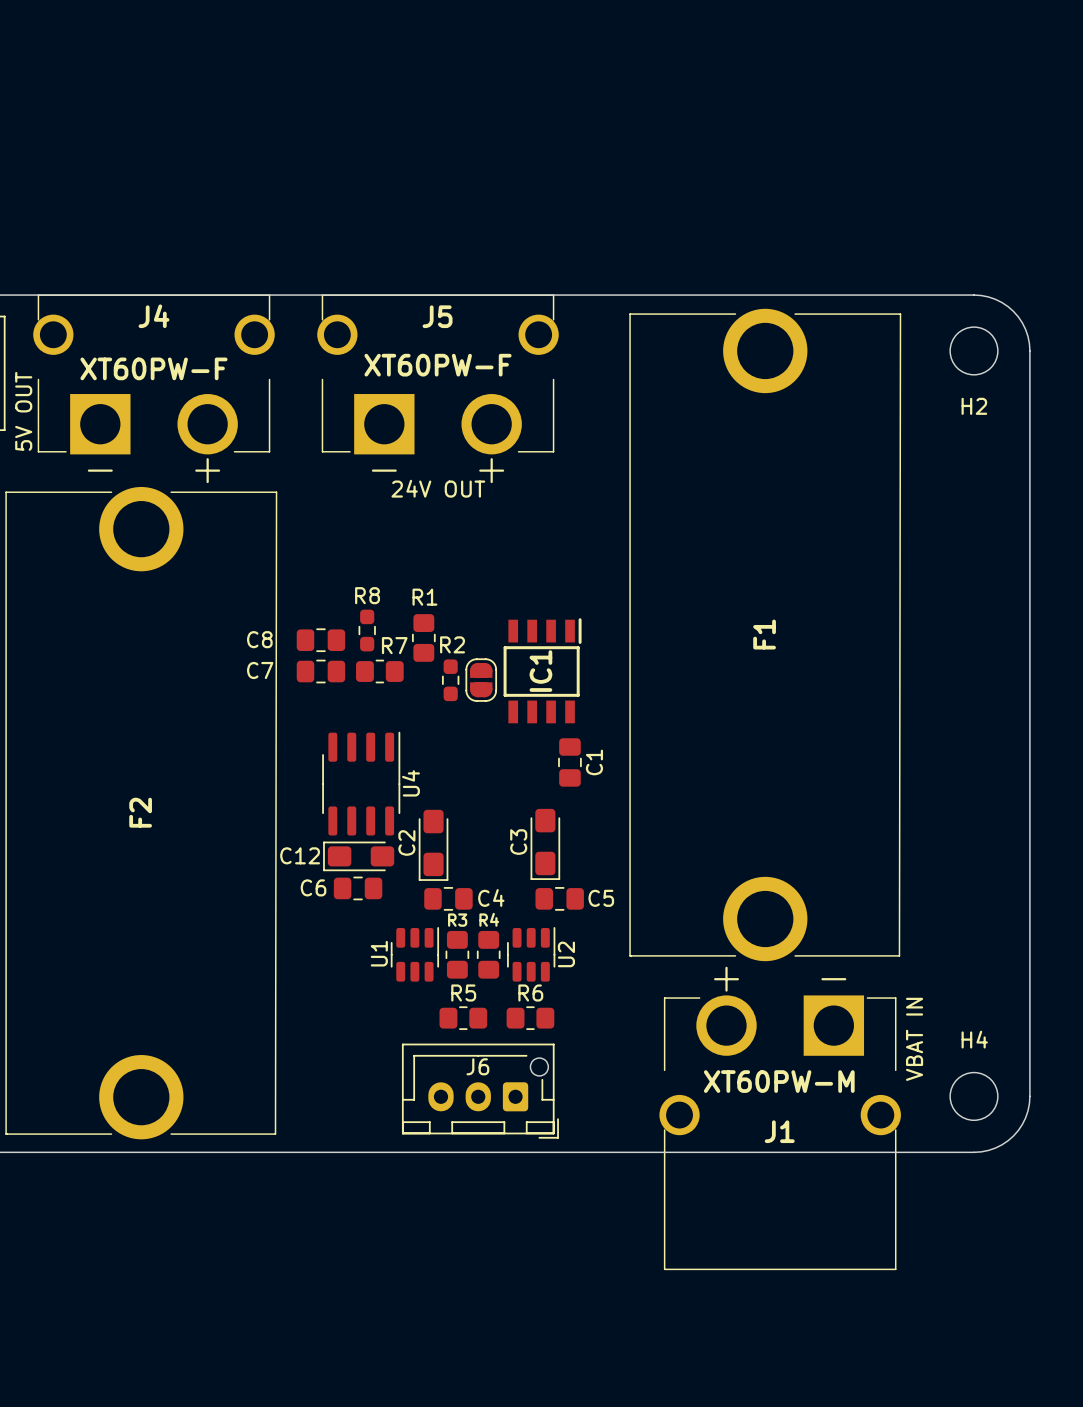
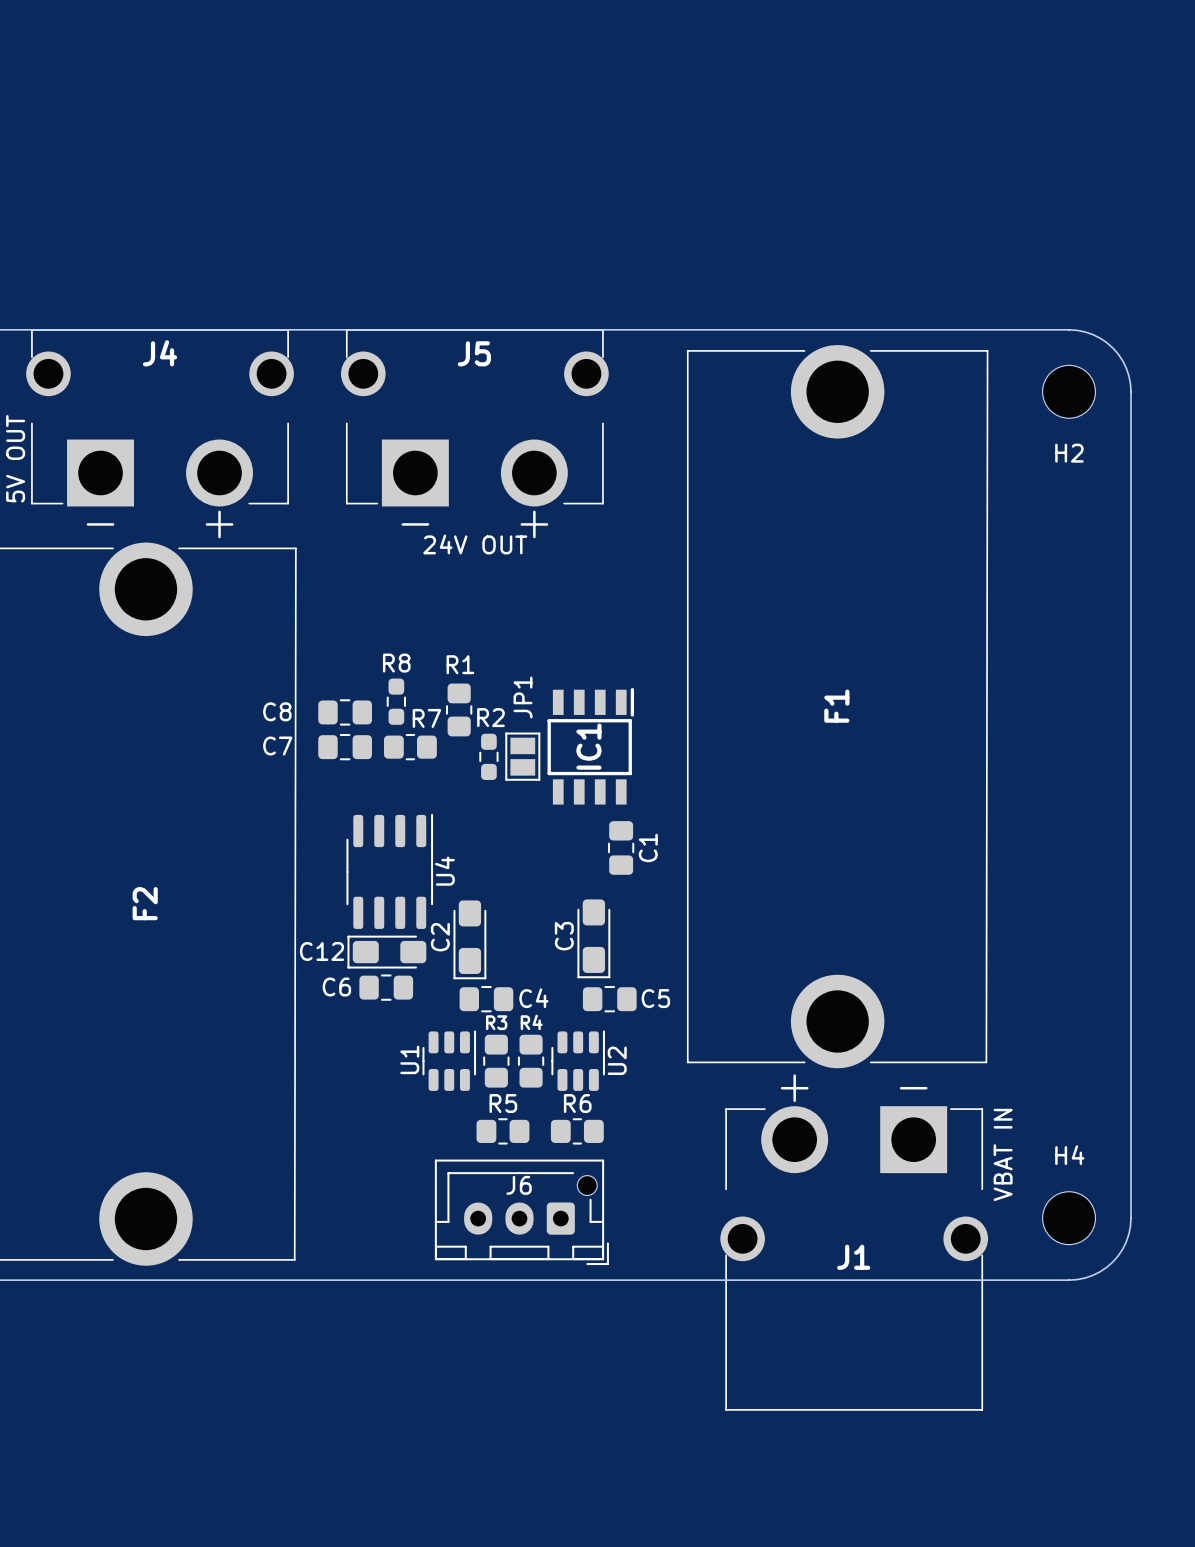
J5 value: XT60PW-F (438, 365) -> none
J4 value: XT60PW-F (153, 368) -> none
part: (481, 680) -> none
JP1: none -> (522, 756)
J1 value: XT60PW-M (779, 1081) -> none

